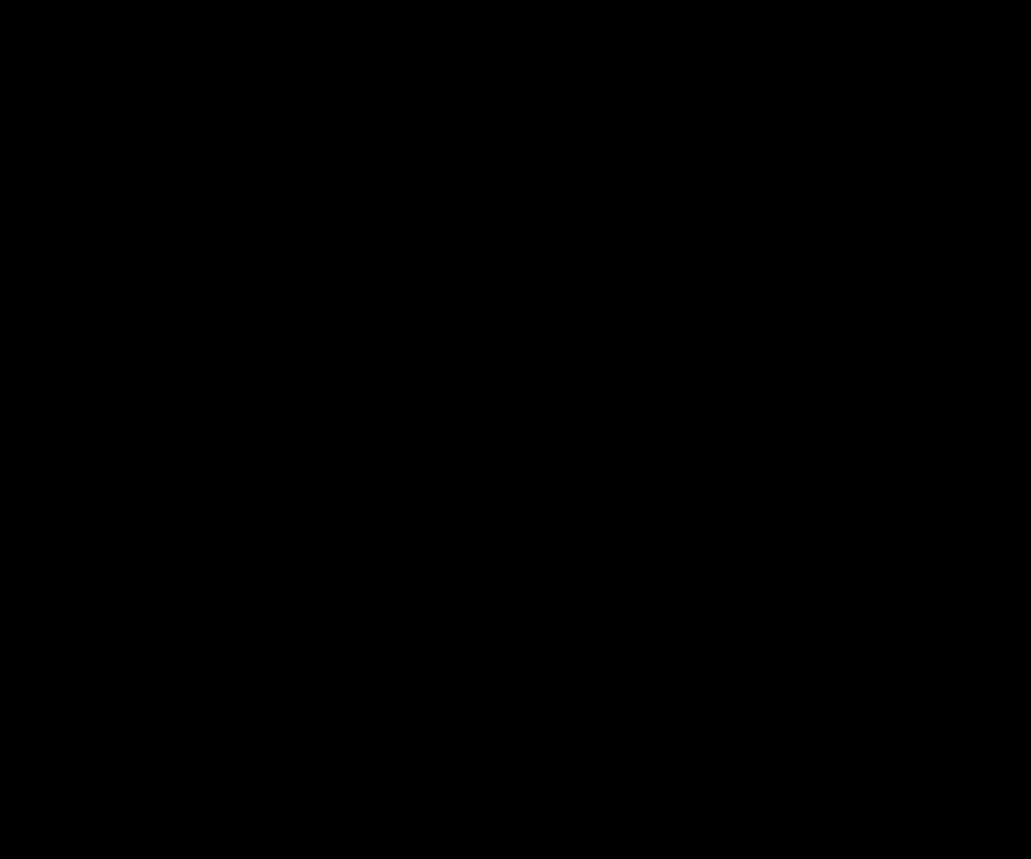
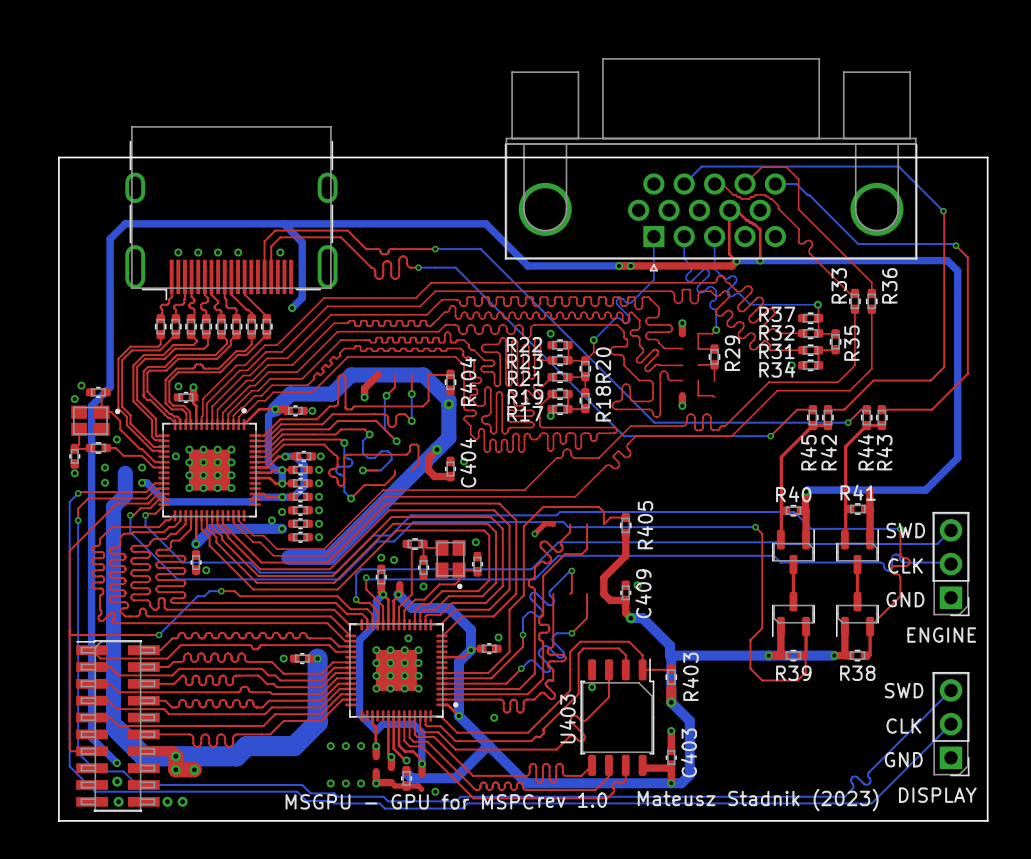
board edge: none -> (58, 157) (987, 157) (987, 820) (58, 820) (58, 157)
part: none -> (711, 164)
bottom track: none -> (684, 184) (701, 166) (898, 166) (943, 211)
top track: none -> (714, 184) (722, 184) (733, 194) (741, 198) (749, 198) (755, 194) (764, 194) (771, 198) (798, 229) (798, 242) (811, 241) (809, 253) (849, 293) (854, 293)
top track: none -> (745, 184) (761, 167) (786, 167) (798, 179) (798, 209) (871, 282) (871, 293)
bottom track: none -> (775, 184) (796, 184) (858, 244) (954, 244) (956, 245)
top track: none -> (943, 211) (944, 367) (930, 380) (873, 380) (844, 409) (827, 409)
via: none -> (943, 211)
part: none -> (231, 213)
bottom track: none -> (283, 223) (302, 242) (302, 297) (292, 308)
bottom track: none -> (653, 236) (653, 280) (630, 302) (627, 302) (621, 298) (617, 300) (617, 304) (629, 317) (628, 321) (625, 322) (619, 318) (615, 318) (593, 340)
bottom track: none -> (684, 236) (684, 258) (692, 268) (686, 276) (686, 279) (691, 281) (702, 270) (706, 269) (709, 275) (698, 286) (697, 290) (702, 292) (710, 286) (716, 290) (715, 299) (710, 303) (711, 307) (716, 311) (716, 330)
bottom track: none -> (714, 236) (714, 268) (724, 278) (732, 275) (736, 278) (727, 290) (729, 295) (739, 293) (750, 304) (817, 304)
top track: none -> (956, 245) (967, 257) (967, 373) (931, 409) (881, 409)
via: none -> (956, 245)
top track: none -> (435, 249) (390, 249) (387, 253) (382, 254) (378, 249) (366, 249) (347, 230) (275, 230) (264, 241) (264, 276)
bottom track: none -> (435, 249) (480, 249) (654, 422) (848, 422)
via: none -> (435, 249)
via: none -> (178, 252)
via: none -> (198, 252)
via: none -> (217, 252)
via: none -> (238, 252)
via: none -> (280, 252)
top track: none -> (760, 260) (760, 229) (736, 210) (729, 210) (729, 254) (736, 261)
via: none -> (760, 260)
top track: none -> (736, 261) (731, 265) (619, 265)
bottom track: none -> (736, 261) (947, 260) (957, 271) (957, 458) (925, 490) (807, 490) (806, 491)
via: none -> (736, 261)
via: none -> (619, 265)
bottom track: none -> (630, 265) (528, 265) (485, 223) (125, 223) (110, 239) (110, 387) (91, 405) (91, 737) (116, 763)
via: none -> (630, 265)
top track: none -> (418, 267) (408, 266) (406, 258) (402, 256) (399, 259) (398, 277) (392, 277) (390, 263) (386, 261) (383, 263) (382, 276) (378, 278) (375, 276) (374, 268) (341, 237) (280, 237) (271, 246) (271, 276)
bottom track: none -> (418, 267) (455, 267) (624, 436) (770, 436)
via: none -> (418, 267)
top track: none -> (171, 276) (171, 297) (167, 304) (160, 306) (162, 309) (160, 318)
top track: none -> (184, 276) (184, 303) (174, 306) (175, 318)
top track: none -> (191, 276) (191, 296) (194, 301) (189, 306) (194, 309) (194, 315) (191, 318)
top track: none -> (204, 276) (204, 294) (207, 301) (202, 303) (201, 308) (206, 311) (206, 318)
top track: none -> (211, 276) (211, 294) (217, 301) (214, 308) (221, 311) (221, 318)
top track: none -> (224, 276) (226, 306) (236, 309) (236, 318)
top track: none -> (231, 276) (231, 294) (251, 313) (251, 318)
top track: none -> (244, 276) (244, 294) (266, 318)
R33: none -> (854, 301)
R36: none -> (871, 301)
top track: none -> (817, 304) (818, 333) (835, 333)
via: none -> (817, 304)
via: none -> (292, 308)
top track: none -> (854, 309) (854, 365) (838, 382) (769, 382) (725, 426) (720, 426) (718, 429) (711, 429) (710, 417) (706, 414) (703, 416) (702, 428) (701, 430) (695, 429) (694, 417) (690, 414) (687, 416) (686, 423) (683, 426) (630, 426) (598, 458) (574, 457) (570, 450) (565, 449) (562, 456) (556, 458) (524, 490) (383, 490) (324, 549) (276, 549) (263, 535) (253, 535) (238, 520) (238, 515)
top track: none -> (871, 309) (871, 368) (849, 390) (777, 390) (731, 436) (635, 436) (627, 445) (630, 452) (629, 456) (624, 456) (618, 451) (613, 455) (618, 462) (618, 467) (614, 468) (606, 465) (575, 496) (384, 496) (325, 555) (273, 555) (260, 542) (253, 542) (233, 522) (233, 515)
R37: none -> (810, 318)
top track: none -> (682, 323) (682, 333)
via: none -> (682, 323)
part: none -> (160, 326)
part: none -> (175, 326)
part: none -> (191, 326)
part: none -> (206, 326)
part: none -> (221, 326)
part: none -> (236, 326)
part: none -> (251, 326)
part: none -> (266, 326)
top track: none -> (716, 330) (712, 333) (698, 333) (698, 349) (714, 349)
via: none -> (716, 330)
via: none -> (550, 333)
top track: none -> (802, 333) (779, 333) (772, 328) (765, 333) (761, 333) (760, 328) (773, 315) (774, 310) (768, 308) (755, 321) (751, 322) (749, 317) (762, 303) (762, 299) (757, 297) (744, 310) (739, 310) (738, 305) (751, 292) (751, 288) (747, 286) (740, 291) (737, 291) (721, 275) (718, 276) (713, 282) (431, 282) (415, 297) (324, 297) (276, 345) (265, 345) (244, 365) (236, 365) (202, 399) (201, 424)
R32: none -> (810, 333)
top track: none -> (160, 334) (160, 344) (158, 346) (130, 346) (118, 358) (118, 408) (126, 416) (126, 425) (152, 450) (163, 451)
top track: none -> (175, 334) (160, 350) (132, 350) (122, 360) (122, 406) (130, 415) (130, 423) (153, 447) (163, 446)
top track: none -> (191, 334) (196, 340) (193, 344) (173, 344) (163, 355) (143, 355) (133, 365) (133, 401) (152, 420) (152, 436) (155, 440) (163, 440)
top track: none -> (206, 334) (207, 345) (204, 348) (174, 348) (164, 358) (145, 358) (137, 367) (137, 399) (155, 418) (155, 435) (163, 435)
top track: none -> (221, 334) (227, 340) (227, 343) (215, 355) (176, 355) (164, 366) (148, 366) (143, 371) (143, 396) (147, 400) (150, 399) (175, 423)
top track: none -> (236, 334) (230, 340) (230, 345) (217, 358) (178, 358) (166, 370) (149, 370) (147, 372) (147, 391) (169, 414) (177, 416) (180, 424)
top track: none -> (251, 334) (251, 344) (244, 351) (236, 351) (218, 368) (204, 368) (200, 364) (195, 364) (192, 368) (176, 368) (165, 379) (165, 403) (171, 409) (182, 409) (186, 413) (185, 424)
top track: none -> (266, 334) (246, 354) (237, 354) (220, 372) (178, 372) (169, 381) (169, 401) (173, 405) (183, 405) (190, 411) (190, 424)
top track: none -> (593, 340) (593, 352) (585, 360) (568, 360) (568, 345)
via: none -> (593, 340)
R35: none -> (835, 341)
top track: none -> (769, 344) (764, 340) (755, 349) (751, 349) (749, 345) (754, 338) (753, 334) (749, 333) (741, 338) (738, 334) (743, 327) (742, 323) (738, 322) (731, 327) (727, 325) (727, 321) (732, 315) (731, 311) (727, 310) (720, 315) (716, 314) (716, 309) (729, 296) (726, 291) (717, 296) (710, 291) (700, 291) (697, 301) (694, 303) (690, 301) (689, 289) (682, 289) (682, 300) (678, 303) (674, 300) (673, 293) (670, 291) (435, 291) (420, 306) (327, 306) (282, 351) (266, 351) (247, 370) (239, 370) (206, 403) (206, 424)
top track: none -> (769, 344) (769, 350) (802, 350)
R22: none -> (560, 345)
top track: none -> (682, 348) (664, 348) (657, 339) (646, 337) (648, 332) (669, 332) (672, 328) (669, 324) (646, 323) (647, 318) (656, 317) (659, 314) (659, 307) (648, 297) (642, 297) (642, 306) (638, 309) (635, 307) (634, 297) (628, 297) (627, 304) (624, 306) (620, 304) (619, 297) (613, 297) (612, 304) (609, 306) (606, 304) (605, 297) (599, 297) (598, 304) (594, 306) (591, 304) (590, 297) (585, 297) (583, 304) (579, 306) (577, 304) (576, 297) (570, 297) (568, 304) (565, 306) (562, 304) (561, 297) (555, 297) (554, 304) (550, 306) (547, 304) (547, 297) (541, 297) (539, 304) (536, 306) (533, 304) (532, 297) (526, 297) (525, 304) (521, 306) (518, 304) (518, 297) (512, 297) (510, 304) (507, 306) (504, 304) (503, 297) (497, 297) (495, 304) (492, 306) (489, 304) (488, 297) (483, 297) (481, 304) (477, 306) (474, 304) (474, 297) (468, 297) (467, 304) (464, 306) (460, 305) (457, 299) (442, 299) (426, 314) (330, 314) (287, 358) (267, 358) (250, 375) (243, 375) (212, 406) (212, 424)
top track: none -> (835, 349) (818, 350) (818, 365)
R31: none -> (810, 350)
R29: none -> (714, 356)
top track: none -> (552, 360) (540, 359) (540, 340) (535, 339) (534, 376) (530, 378) (528, 346) (524, 345) (523, 383) (518, 385) (517, 342) (513, 340) (511, 383) (508, 386) (505, 383) (505, 339) (501, 338) (497, 344) (484, 344) (481, 348) (483, 351) (497, 352) (500, 355) (500, 383) (497, 386) (494, 384) (493, 372) (483, 371) (481, 369) (483, 366) (493, 365) (493, 361) (484, 360) (474, 350) (471, 350) (464, 340) (451, 342) (448, 332) (445, 334) (443, 342) (439, 342) (437, 337) (433, 337) (432, 342) (428, 342) (426, 337) (422, 337) (420, 342) (416, 342) (414, 337) (410, 337) (409, 342) (405, 342) (403, 337) (399, 337) (397, 342) (393, 342) (392, 337) (387, 337) (386, 342) (382, 342) (380, 337) (376, 337) (374, 342) (369, 340) (341, 340) (302, 378) (270, 378) (258, 390) (251, 390) (228, 414) (228, 424)
R23: none -> (560, 360)
top track: none -> (682, 365) (657, 364) (649, 370) (646, 370) (645, 366) (658, 353) (655, 349) (641, 362) (637, 362) (636, 358) (643, 350) (639, 345) (639, 337) (630, 333) (631, 330) (637, 329) (639, 327) (639, 320) (631, 312) (629, 313) (628, 321) (625, 323) (622, 321) (622, 313) (619, 312) (613, 318) (607, 312) (601, 318) (595, 312) (589, 318) (583, 312) (577, 318) (571, 312) (565, 318) (560, 312) (554, 318) (548, 312) (542, 318) (536, 312) (530, 318) (524, 312) (518, 318) (512, 312) (507, 318) (500, 312) (496, 318) (493, 318) (488, 312) (482, 318) (476, 312) (470, 318) (464, 312) (458, 318) (455, 316) (455, 307) (452, 305) (448, 311) (444, 312) (431, 325) (426, 325) (425, 320) (420, 320) (419, 325) (414, 325) (413, 320) (408, 320) (407, 325) (403, 325) (401, 320) (397, 320) (395, 325) (391, 325) (389, 320) (385, 320) (383, 325) (379, 325) (377, 320) (373, 320) (371, 325) (367, 325) (365, 320) (361, 320) (359, 325) (355, 325) (353, 320) (349, 320) (347, 323) (334, 323) (292, 365) (268, 365) (252, 380) (246, 380) (217, 409) (217, 424)
top track: none -> (698, 365) (714, 364) (714, 381)
via: none -> (791, 365)
R34: none -> (810, 365)
R20: none -> (585, 368)
top track: none -> (378, 374) (364, 388) (364, 397)
top track: none -> (394, 374) (394, 387) (386, 395)
top track: none -> (411, 374) (411, 394)
top track: none -> (450, 374) (428, 374) (428, 400) (422, 406) (354, 406) (351, 409) (345, 408) (345, 377) (340, 374) (338, 377) (336, 405) (329, 406) (316, 419) (280, 419) (264, 435) (255, 435)
top track: none -> (552, 377) (542, 386) (536, 384) (534, 385) (534, 388) (539, 394) (538, 398) (535, 398) (527, 390) (524, 391) (523, 394) (527, 400) (522, 405) (514, 405) (513, 393) (510, 391) (508, 393) (509, 409) (531, 410) (533, 413) (531, 416) (510, 416) (508, 420) (531, 421) (533, 424) (531, 427) (510, 427) (506, 433) (503, 432) (502, 394) (500, 391) (497, 392) (496, 431) (493, 433) (489, 425) (483, 422) (481, 419) (483, 416) (490, 412) (490, 389) (487, 387) (485, 389) (483, 405) (477, 405) (470, 399) (470, 395) (476, 394) (477, 390) (470, 388) (470, 384) (479, 383) (481, 380) (479, 377) (470, 376) (470, 372) (474, 370) (474, 362) (469, 357) (464, 357) (460, 348) (447, 348) (445, 351) (439, 348) (433, 351) (428, 348) (422, 351) (416, 348) (410, 351) (402, 348) (396, 351) (390, 348) (384, 351) (379, 348) (373, 351) (367, 348) (361, 351) (360, 346) (356, 345) (353, 348) (344, 348) (336, 358) (333, 357) (330, 360) (331, 363) (328, 366) (324, 365) (321, 368) (323, 371) (320, 374) (316, 373) (307, 385) (272, 385) (261, 395) (254, 395) (233, 415) (233, 424)
R21: none -> (560, 377)
top track: none -> (567, 377) (585, 376) (585, 392)
top track: none -> (682, 380) (669, 380) (666, 372) (661, 372) (660, 413) (658, 416) (654, 416) (649, 409) (614, 408) (613, 403) (621, 398) (622, 387) (625, 384) (629, 386) (630, 397) (632, 401) (649, 401) (653, 397) (651, 381) (639, 380) (624, 365) (622, 355) (611, 352) (613, 347) (627, 345) (624, 331) (617, 324) (534, 324) (531, 327) (530, 336) (526, 338) (523, 335) (522, 326) (518, 324) (510, 334) (502, 324) (494, 334) (487, 324) (479, 334) (471, 324) (463, 334) (455, 324) (445, 324) (438, 331) (337, 331) (297, 372) (268, 372) (255, 385) (250, 385) (222, 412) (222, 424)
top track: none -> (698, 380) (698, 395) (714, 397)
R404: none -> (450, 382)
via: none -> (81, 385)
via: none -> (178, 386)
top track: none -> (193, 387) (196, 424)
via: none -> (193, 387)
part: none -> (98, 392)
top track: none -> (105, 392) (101, 396) (101, 412) (111, 412) (120, 420) (120, 429) (139, 449) (155, 462) (163, 462)
bottom track: none -> (411, 394) (411, 420)
via: none -> (411, 394)
top track: none -> (552, 394) (539, 406) (541, 427) (613, 427) (616, 431) (598, 433) (593, 441) (591, 439) (589, 433) (583, 433) (581, 447) (578, 449) (575, 447) (574, 433) (567, 434) (565, 442) (563, 443) (560, 442) (559, 434) (555, 433) (553, 435) (553, 449) (550, 451) (547, 449) (546, 433) (541, 433) (536, 439) (532, 439) (530, 436)
R19: none -> (560, 394)
top track: none -> (567, 394) (567, 409) (585, 408)
bottom track: none -> (386, 395) (384, 397) (384, 429) (396, 441)
via: none -> (386, 395)
top track: none -> (682, 395) (682, 405)
part: none -> (185, 397)
via: none -> (364, 397)
via: none -> (74, 399)
R18: none -> (585, 400)
via: none -> (448, 404)
via: none -> (682, 405)
via: none -> (275, 409)
R17: none -> (560, 409)
top track: none -> (812, 409) (797, 409) (770, 436)
top track: none -> (866, 409) (861, 409) (848, 422)
top track: none -> (287, 410) (286, 409) (259, 409) (244, 424)
part: none -> (295, 410)
via: none -> (312, 410)
via: none -> (550, 415)
R45: none -> (812, 417)
R42: none -> (827, 417)
R44: none -> (866, 417)
R43: none -> (881, 417)
part: none -> (95, 420)
top track: none -> (411, 420) (405, 414) (398, 414) (396, 417) (395, 425) (391, 427) (388, 425) (387, 417) (385, 414) (332, 414) (322, 424) (281, 424) (264, 440) (255, 440)
via: none -> (411, 420)
via: none -> (848, 422)
top track: none -> (238, 424) (238, 417) (243, 412) (246, 412) (258, 400) (265, 400) (273, 392) (312, 392) (347, 356) (455, 356) (464, 365) (464, 408) (474, 410) (475, 412) (474, 415) (465, 416) (464, 419) (470, 426) (470, 434) (475, 439) (478, 437) (479, 429) (484, 430) (485, 451) (489, 450) (490, 441) (492, 439) (495, 441) (496, 450) (500, 451) (501, 441) (504, 439) (507, 441) (507, 450) (511, 451) (513, 435) (515, 433) (518, 436) (518, 450) (522, 452) (524, 449) (524, 434) (528, 433) (530, 436)
top track: none -> (827, 425) (812, 425) (781, 457) (780, 539)
top track: none -> (881, 425) (866, 425) (845, 446) (844, 539)
top track: none -> (79, 429) (79, 444) (74, 448) (90, 447)
top track: none -> (369, 434) (364, 429) (341, 429) (335, 434) (282, 434) (265, 451) (255, 451)
bottom track: none -> (369, 434) (362, 441) (362, 453) (367, 458) (374, 458) (381, 451) (388, 451) (391, 454) (391, 459) (380, 470) (362, 470)
via: none -> (369, 434)
via: none -> (770, 436)
via: none -> (116, 439)
top track: none -> (396, 441) (376, 420) (337, 420) (329, 429) (281, 429) (264, 446) (255, 446)
via: none -> (396, 441)
top track: none -> (344, 442) (341, 439) (283, 439) (265, 456) (255, 456)
bottom track: none -> (344, 442) (344, 455) (348, 458)
via: none -> (344, 442)
part: none -> (98, 447)
top track: none -> (106, 447) (115, 447) (123, 455) (142, 455) (153, 467) (163, 467)
via: none -> (189, 449)
via: none -> (203, 449)
via: none -> (217, 449)
via: none -> (231, 449)
top track: none -> (437, 449) (428, 458) (428, 470) (434, 476) (450, 476)
via: none -> (437, 449)
part: none -> (74, 456)
via: none -> (175, 456)
bottom track: none -> (285, 456) (295, 456) (303, 464) (303, 486) (293, 497) (256, 497) (251, 501) (165, 501) (146, 482) (142, 482)
via: none -> (285, 456)
top track: none -> (296, 456) (278, 456) (267, 467) (255, 467)
part: none -> (303, 456)
via: none -> (320, 456)
bottom track: none -> (348, 458) (351, 460) (351, 464) (337, 467) (336, 471) (340, 474)
via: none -> (464, 461)
via: none -> (189, 462)
via: none -> (203, 462)
via: none -> (217, 462)
via: none -> (231, 462)
top track: none -> (255, 462) (266, 462) (283, 444) (324, 444) (337, 456) (337, 466) (330, 469) (329, 473) (336, 477) (338, 484) (341, 485) (344, 482) (344, 457) (346, 455) (406, 454) (410, 451) (410, 446) (416, 444) (418, 446) (418, 463) (411, 470)
part: none -> (209, 464)
via: none -> (105, 467)
via: none -> (142, 467)
C404: none -> (450, 468)
top track: none -> (292, 469) (255, 472)
part: none -> (300, 469)
via: none -> (319, 469)
via: none -> (282, 470)
top track: none -> (362, 470) (378, 470)
via: none -> (362, 470)
top track: none -> (394, 470) (394, 474) (384, 485) (364, 485) (351, 498)
via: none -> (74, 473)
bottom track: none -> (125, 473) (125, 495) (113, 506) (113, 725) (143, 756) (236, 756) (246, 746) (294, 746) (317, 722) (317, 658)
bottom track: none -> (340, 474) (344, 477) (344, 491) (351, 498)
via: none -> (189, 475)
via: none -> (203, 475)
via: none -> (217, 475)
via: none -> (231, 475)
top track: none -> (255, 478) (270, 478) (275, 483) (292, 483)
via: none -> (105, 482)
via: none -> (142, 482)
top track: none -> (163, 483) (155, 483) (146, 492) (78, 493)
bottom track: none -> (282, 483) (282, 470) (275, 470) (268, 463) (268, 415) (290, 394) (332, 394) (351, 375) (423, 375) (448, 400) (448, 437) (329, 557) (288, 557)
via: none -> (282, 483)
part: none -> (300, 483)
via: none -> (319, 483)
top track: none -> (163, 488) (156, 488) (146, 498) (88, 498) (78, 508) (78, 520)
via: none -> (189, 488)
via: none -> (203, 488)
via: none -> (217, 488)
via: none -> (231, 488)
top track: none -> (869, 490) (869, 509)
top track: none -> (806, 491) (806, 539)
via: none -> (806, 491)
bottom track: none -> (78, 493) (69, 501) (69, 766) (94, 791) (297, 791) (306, 800) (331, 800) (334, 803) (379, 803) (384, 808) (462, 808) (467, 803) (871, 803) (950, 724)
via: none -> (78, 493)
top track: none -> (163, 493) (157, 493) (148, 503) (116, 503) (69, 550) (69, 749) (71, 751) (92, 751)
top track: none -> (255, 493) (264, 493) (267, 497) (282, 497)
part: none -> (300, 496)
via: none -> (319, 496)
via: none -> (282, 497)
via: none -> (351, 498)
top track: none -> (163, 499) (159, 499) (150, 508) (140, 508) (133, 515) (130, 515)
top track: none -> (163, 504) (155, 513) (145, 515)
R41: none -> (857, 509)
top track: none -> (870, 509) (870, 539)
part: none -> (300, 510)
via: none -> (319, 510)
R40: none -> (793, 510)
via: none -> (282, 511)
bottom track: none -> (130, 515) (130, 532) (177, 579) (339, 579) (377, 541) (394, 541) (413, 522) (563, 522) (568, 527) (755, 527)
via: none -> (130, 515)
bottom track: none -> (145, 515) (145, 525) (182, 562) (250, 562) (260, 572) (335, 572) (373, 535) (390, 535) (410, 515) (556, 515) (560, 511) (794, 511) (811, 528) (900, 528)
via: none -> (145, 515)
top track: none -> (175, 515) (169, 520) (165, 520) (159, 527) (111, 527) (100, 538) (99, 545) (92, 547) (93, 551) (103, 553) (103, 557) (94, 558) (92, 560) (93, 563) (103, 566) (103, 570) (94, 570) (92, 573) (93, 576) (103, 578) (102, 582) (94, 582) (92, 585) (93, 588) (103, 589) (103, 593) (100, 596) (101, 612) (98, 617) (99, 620) (103, 620) (112, 612) (115, 615) (113, 623) (327, 623) (345, 641) (350, 641)
top track: none -> (180, 515) (180, 520) (174, 527) (169, 527) (164, 532) (123, 533) (120, 537) (119, 546) (109, 549) (111, 553) (123, 553) (125, 555) (123, 559) (112, 559) (109, 562) (111, 565) (123, 565) (125, 567) (123, 571) (112, 572) (109, 575) (111, 577) (125, 579) (123, 583) (112, 584) (109, 587) (112, 590) (124, 590) (124, 595) (112, 596) (109, 599) (112, 602) (127, 603) (127, 607) (120, 611) (125, 616) (138, 616) (142, 608) (148, 616) (330, 616) (350, 635)
top track: none -> (185, 515) (185, 524) (175, 533) (170, 533) (165, 538) (153, 538) (148, 545) (133, 545) (131, 548) (133, 551) (147, 551) (150, 554) (147, 557) (131, 559) (133, 563) (147, 564) (150, 567) (147, 569) (131, 571) (132, 575) (147, 576) (150, 579) (147, 582) (132, 582) (132, 587) (147, 588) (150, 591) (147, 594) (132, 594) (131, 598) (148, 600) (153, 609) (158, 607) (160, 598) (163, 598) (164, 601)
top track: none -> (190, 515) (190, 528) (179, 540) (172, 540) (169, 549) (158, 549) (156, 552) (158, 555) (182, 555) (185, 557) (182, 561) (158, 561) (156, 564) (158, 567) (182, 567) (185, 569) (182, 573) (158, 574) (156, 576) (158, 579) (184, 581) (182, 586) (156, 587) (158, 592) (184, 593) (183, 597) (171, 598) (172, 602) (335, 602) (346, 613) (362, 613) (367, 619) (367, 624)
top track: none -> (196, 515) (196, 543)
top track: none -> (201, 515) (201, 529) (209, 537) (209, 545) (253, 589) (337, 589) (396, 530) (484, 530) (489, 535) (489, 580) (478, 591) (442, 591) (428, 604) (421, 604) (414, 611) (414, 624)
top track: none -> (206, 515) (206, 527) (216, 537) (216, 542) (256, 582) (334, 582) (393, 523) (487, 523) (496, 532) (496, 582) (482, 596) (448, 596) (435, 609) (423, 609) (420, 613) (420, 624)
top track: none -> (212, 515) (212, 526) (222, 536) (222, 539) (258, 576) (332, 576) (391, 517) (490, 517) (502, 528) (502, 586) (485, 602) (452, 602) (440, 614) (426, 614) (425, 624)
top track: none -> (217, 515) (217, 525) (260, 569) (330, 569) (388, 510) (494, 510) (509, 525) (509, 589) (489, 609) (455, 609) (440, 624) (430, 624)
top track: none -> (222, 515) (222, 523) (227, 528)
top track: none -> (625, 517) (610, 517) (603, 524) (603, 511) (598, 506) (543, 506) (523, 526) (523, 595) (509, 609) (509, 651) (488, 673) (441, 673)
bottom track: none -> (78, 520) (78, 752) (96, 771) (123, 771) (137, 784) (302, 784) (310, 793) (334, 793) (337, 796) (383, 796) (388, 801) (456, 801) (460, 796) (844, 796) (852, 788) (852, 783)
via: none -> (78, 520)
via: none -> (271, 520)
part: none -> (300, 523)
via: none -> (319, 523)
top track: none -> (553, 524) (544, 523) (534, 533)
top track: none -> (570, 524) (570, 532) (561, 541) (562, 548) (560, 551) (556, 551) (546, 541) (541, 542) (541, 547) (551, 560) (547, 563) (539, 562) (534, 567) (534, 577) (528, 581) (529, 586) (534, 590) (534, 673) (519, 688) (441, 688)
top track: none -> (587, 524) (587, 549) (581, 554) (565, 554) (543, 576) (543, 614) (539, 617) (539, 622) (547, 625) (549, 627) (547, 632) (539, 634) (539, 639) (543, 642) (543, 678) (527, 694) (441, 694)
R405: none -> (625, 525)
top track: none -> (755, 527) (762, 533) (762, 628) (750, 640) (750, 668) (762, 680) (797, 680) (805, 672) (806, 626)
via: none -> (755, 527)
top track: none -> (227, 528) (261, 562) (327, 562) (386, 503) (499, 503) (516, 520) (516, 593) (493, 616) (462, 616) (441, 635)
bottom track: none -> (282, 528) (211, 528) (196, 544)
via: none -> (282, 528)
top track: none -> (900, 528) (900, 555) (908, 559) (909, 563) (906, 565) (894, 566) (891, 568) (892, 572) (900, 576) (900, 596) (870, 626) (869, 655)
via: none -> (900, 528)
text: none -> SWD (905, 530)
bottom track: none -> (950, 530) (937, 544) (558, 542) (531, 569) (361, 569) (356, 574) (356, 599)
via: none -> (534, 533)
top track: none -> (625, 533) (625, 555) (603, 577) (603, 593) (610, 600) (625, 600) (625, 613) (630, 618)
part: none -> (300, 537)
via: none -> (319, 537)
via: none -> (475, 542)
via: none -> (196, 544)
top track: none -> (407, 544) (411, 548) (411, 594) (399, 607) (399, 624)
part: none -> (415, 544)
top track: none -> (423, 544) (426, 547) (441, 547)
top track: none -> (423, 547) (423, 560)
part: none -> (793, 551)
part: none -> (857, 551)
via: none -> (381, 557)
bottom track: none -> (900, 558) (897, 554) (893, 555) (891, 568) (888, 570) (880, 562) (780, 562) (774, 555) (558, 555) (534, 579) (367, 579) (366, 577)
bottom track: none -> (900, 558) (903, 562) (950, 564)
via: none -> (394, 560)
part: none -> (196, 562)
part: none -> (450, 564)
part: none -> (477, 564)
top track: none -> (793, 564) (793, 601)
top track: none -> (857, 564) (857, 601)
part: none -> (950, 564)
text: none -> CLK (905, 565)
part: none -> (423, 567)
via: none -> (206, 570)
top track: none -> (571, 570) (571, 592) (570, 593)
bottom track: none -> (571, 570) (550, 591) (549, 595) (554, 600) (552, 604) (547, 604) (535, 593) (531, 594) (530, 598) (541, 610) (542, 613) (538, 616) (529, 612) (522, 618) (522, 634)
via: none -> (571, 570)
top track: none -> (477, 571) (459, 570) (459, 580) (455, 584) (439, 584) (424, 599) (415, 599) (404, 610) (404, 624)
top track: none -> (366, 577) (366, 589) (383, 606) (383, 624)
via: none -> (366, 577)
part: none -> (381, 577)
top track: none -> (381, 584) (381, 592) (388, 599) (388, 624)
top track: none -> (399, 584) (399, 593) (393, 600) (393, 624)
via: none -> (637, 585)
via: none -> (423, 586)
top track: none -> (221, 591) (234, 591) (239, 596) (337, 596) (350, 609) (367, 609) (372, 614) (372, 624)
bottom track: none -> (221, 591) (209, 591) (204, 596) (197, 596) (159, 634)
via: none -> (221, 591)
C409: none -> (625, 592)
top track: none -> (553, 593) (553, 645) (548, 648) (547, 652) (550, 654) (563, 654) (565, 658) (563, 661) (550, 661) (547, 663) (548, 666) (553, 670) (553, 680) (548, 680) (545, 684) (554, 694) (554, 698) (550, 698) (544, 693) (541, 692) (534, 699) (524, 700) (523, 710) (520, 712) (517, 710) (516, 701) (514, 699) (510, 701) (510, 710) (507, 712) (504, 710) (503, 702) (501, 699) (441, 699)
top track: none -> (587, 593) (587, 618) (571, 633)
bottom track: none -> (383, 594) (376, 601) (376, 623) (359, 640) (359, 714) (376, 730) (382, 724) (413, 724) (421, 732) (421, 763)
via: none -> (383, 594)
bottom track: none -> (398, 594) (411, 608) (449, 608) (470, 629) (470, 650) (458, 662) (458, 715) (526, 783) (681, 783) (689, 774) (689, 720) (671, 702) (669, 655)
via: none -> (398, 594)
top track: none -> (356, 599) (359, 602) (369, 602) (377, 611) (377, 624)
via: none -> (356, 599)
text: none -> GND (905, 599)
top track: none -> (164, 601) (164, 607) (166, 609) (334, 609) (349, 624) (361, 624)
part: none -> (793, 614)
part: none -> (857, 614)
bottom track: none -> (630, 618) (642, 618) (669, 645) (669, 655)
via: none -> (630, 618)
top track: none -> (780, 626) (781, 655) (768, 655)
top track: none -> (844, 626) (845, 655) (834, 655)
bottom track: none -> (571, 633) (556, 633) (552, 638) (553, 641) (563, 652) (562, 657) (558, 657) (546, 646) (539, 650) (539, 655) (550, 666) (549, 671) (544, 671) (531, 660) (521, 668)
via: none -> (571, 633)
top track: none -> (69, 634) (159, 634)
via: none -> (159, 634)
top track: none -> (522, 634) (522, 646) (491, 678) (441, 678)
via: none -> (522, 634)
text: none -> ENGINE (941, 635)
via: none -> (498, 637)
via: none -> (408, 638)
top track: none -> (350, 646) (339, 646) (330, 638) (308, 638) (304, 633) (300, 633) (297, 638) (294, 637) (290, 633) (287, 633) (283, 638) (280, 637) (277, 633) (273, 633) (270, 638) (267, 637) (263, 633) (260, 633) (256, 638) (253, 637) (250, 633) (247, 633) (245, 637) (241, 638) (238, 633) (234, 633) (231, 637) (228, 638) (221, 633) (214, 638) (208, 633) (201, 638) (194, 633) (187, 638) (181, 633) (160, 650) (143, 650)
top track: none -> (476, 648) (472, 648) (464, 657) (441, 657)
part: none -> (489, 648)
top track: none -> (92, 650) (100, 658) (167, 658) (180, 645) (250, 645) (254, 649) (258, 648) (261, 645) (329, 645) (335, 651) (350, 651)
via: none -> (376, 650)
via: none -> (390, 650)
via: none -> (404, 650)
via: none -> (418, 650)
via: none -> (470, 650)
bottom track: none -> (669, 655) (834, 655)
via: none -> (768, 655)
R39: none -> (793, 655)
via: none -> (834, 655)
R38: none -> (857, 655)
via: none -> (283, 658)
part: none -> (302, 658)
via: none -> (317, 658)
top track: none -> (350, 662) (332, 662) (321, 673) (283, 673) (271, 661) (247, 661) (242, 653) (239, 654) (237, 660) (234, 661) (232, 660) (230, 654) (226, 653) (224, 660) (221, 661) (218, 660) (217, 654) (213, 653) (207, 661) (205, 660) (203, 654) (200, 653) (194, 661) (187, 653) (184, 655) (183, 661) (173, 661) (168, 667) (143, 667)
via: none -> (376, 662)
via: none -> (390, 662)
via: none -> (404, 662)
via: none -> (418, 662)
top track: none -> (671, 665) (666, 669) (642, 669) (642, 655) (629, 641) (580, 641) (570, 651) (570, 690) (528, 732) (457, 732) (440, 715) (430, 715)
top track: none -> (92, 667) (110, 667) (118, 675) (172, 675) (179, 668) (261, 668) (268, 675) (275, 675) (280, 680) (321, 680) (334, 667) (350, 667)
top track: none -> (521, 668) (506, 683) (441, 683)
via: none -> (521, 668)
top track: none -> (608, 669) (608, 697) (585, 720) (581, 720) (575, 715) (570, 718) (571, 722) (584, 735) (584, 739) (580, 741) (570, 735) (556, 749) (455, 749) (438, 732) (422, 732) (420, 729) (420, 715)
top track: none -> (625, 669) (625, 655) (619, 648) (583, 648) (578, 653) (578, 693) (543, 729) (544, 733) (540, 736) (536, 736) (531, 741) (455, 741) (440, 726) (426, 726) (425, 715)
part: none -> (401, 670)
top track: none -> (350, 673) (335, 673) (321, 687) (276, 687) (273, 683) (266, 683) (258, 675) (235, 675) (230, 685) (226, 683) (226, 677) (222, 675) (219, 677) (219, 683) (216, 685) (213, 683) (212, 677) (209, 675) (206, 677) (205, 683) (203, 685) (200, 683) (199, 677) (195, 675) (193, 677) (192, 683) (189, 685) (186, 683) (185, 677) (182, 675) (174, 683) (143, 683)
via: none -> (376, 675)
via: none -> (390, 675)
via: none -> (404, 675)
via: none -> (418, 675)
R403: none -> (671, 677)
top track: none -> (350, 678) (337, 678) (321, 693) (251, 692) (246, 687) (241, 687) (238, 692) (118, 692) (110, 683) (92, 683)
top track: none -> (350, 683) (338, 683) (321, 700) (269, 700) (262, 707) (255, 707) (250, 699) (243, 707) (236, 699) (229, 707) (223, 699) (216, 707) (210, 699) (202, 707) (196, 699) (189, 707) (183, 699) (175, 707) (171, 707) (165, 700) (143, 700)
via: none -> (592, 687)
top track: none -> (350, 688) (339, 688) (321, 707) (271, 707) (265, 714) (169, 714) (164, 709) (116, 709) (108, 700) (92, 700)
via: none -> (376, 688)
via: none -> (390, 688)
via: none -> (404, 688)
via: none -> (418, 688)
top track: none -> (671, 689) (671, 702)
text: none -> SWD (904, 690)
bottom track: none -> (950, 690) (869, 772) (869, 777)
top track: none -> (350, 694) (341, 694) (321, 714) (275, 714) (263, 725) (118, 725) (110, 717) (92, 717)
top track: none -> (350, 699) (342, 699) (321, 720) (283, 720) (270, 734) (235, 734) (233, 737) (232, 744) (229, 746) (225, 744) (224, 736) (221, 734) (218, 735) (216, 744) (213, 746) (209, 744) (208, 735) (203, 734) (200, 744) (197, 746) (193, 744) (193, 737) (190, 734) (143, 734)
via: none -> (671, 702)
top track: none -> (441, 704) (447, 704) (458, 715)
top track: none -> (372, 715) (372, 723) (375, 726) (376, 756)
top track: none -> (388, 715) (388, 754) (391, 757) (391, 767)
top track: none -> (393, 715) (393, 748) (405, 760)
top track: none -> (399, 715) (399, 745) (404, 751) (413, 751) (422, 760) (422, 774)
top track: none -> (404, 715) (404, 740) (409, 746) (421, 746) (473, 798) (607, 798) (614, 791) (613, 783) (616, 781) (621, 783) (625, 779) (625, 765)
top track: none -> (409, 715) (409, 737) (413, 741) (427, 741) (475, 790) (479, 789) (483, 782) (489, 790) (495, 782) (500, 789) (503, 789) (507, 782) (511, 789) (514, 789) (519, 782) (525, 790) (595, 790) (608, 776) (608, 765)
top track: none -> (414, 715) (414, 734) (417, 736) (434, 736) (473, 775) (527, 775) (529, 773) (530, 765) (533, 763) (536, 766) (536, 780) (539, 782) (542, 780) (543, 766) (546, 763) (549, 766) (549, 780) (553, 782) (556, 780) (556, 766) (558, 764) (562, 765) (563, 773) (566, 775) (581, 775) (592, 765)
via: none -> (458, 715)
via: none -> (494, 717)
U403: none -> (617, 717)
part: none -> (950, 724)
part: none -> (117, 725)
text: none -> CLK (903, 726)
top track: none -> (671, 731) (671, 746)
via: none -> (671, 731)
bottom track: none -> (488, 745) (455, 778) (411, 778) (406, 773)
via: none -> (330, 746)
via: none -> (345, 746)
via: none -> (361, 746)
via: none -> (376, 746)
top track: none -> (143, 751) (172, 751) (175, 754) (175, 769) (194, 769)
via: none -> (175, 756)
via: none -> (391, 757)
C403: none -> (671, 757)
text: none -> GND (903, 759)
via: none -> (406, 760)
via: none -> (116, 763)
via: none -> (422, 763)
top track: none -> (642, 765) (645, 768) (670, 768) (671, 783)
via: none -> (175, 769)
via: none -> (194, 769)
top track: none -> (376, 771) (376, 783) (391, 782) (394, 785) (418, 785) (421, 789)
bottom track: none -> (869, 777) (870, 782) (866, 784) (857, 777) (853, 776) (851, 779) (852, 783)
part: none -> (406, 778)
via: none -> (117, 781)
via: none -> (330, 783)
via: none -> (345, 783)
via: none -> (361, 783)
via: none -> (376, 783)
via: none -> (671, 783)
via: none -> (435, 791)
text: none -> DISPLAY (937, 795)
text: none -> rev 1.0 (572, 800)
text: none -> Mateusz Stadnik (2023) (758, 800)
via: none -> (118, 801)
via: none -> (167, 801)
via: none -> (182, 801)
text: none -> MSGPU - GPU for MSPC (409, 801)

